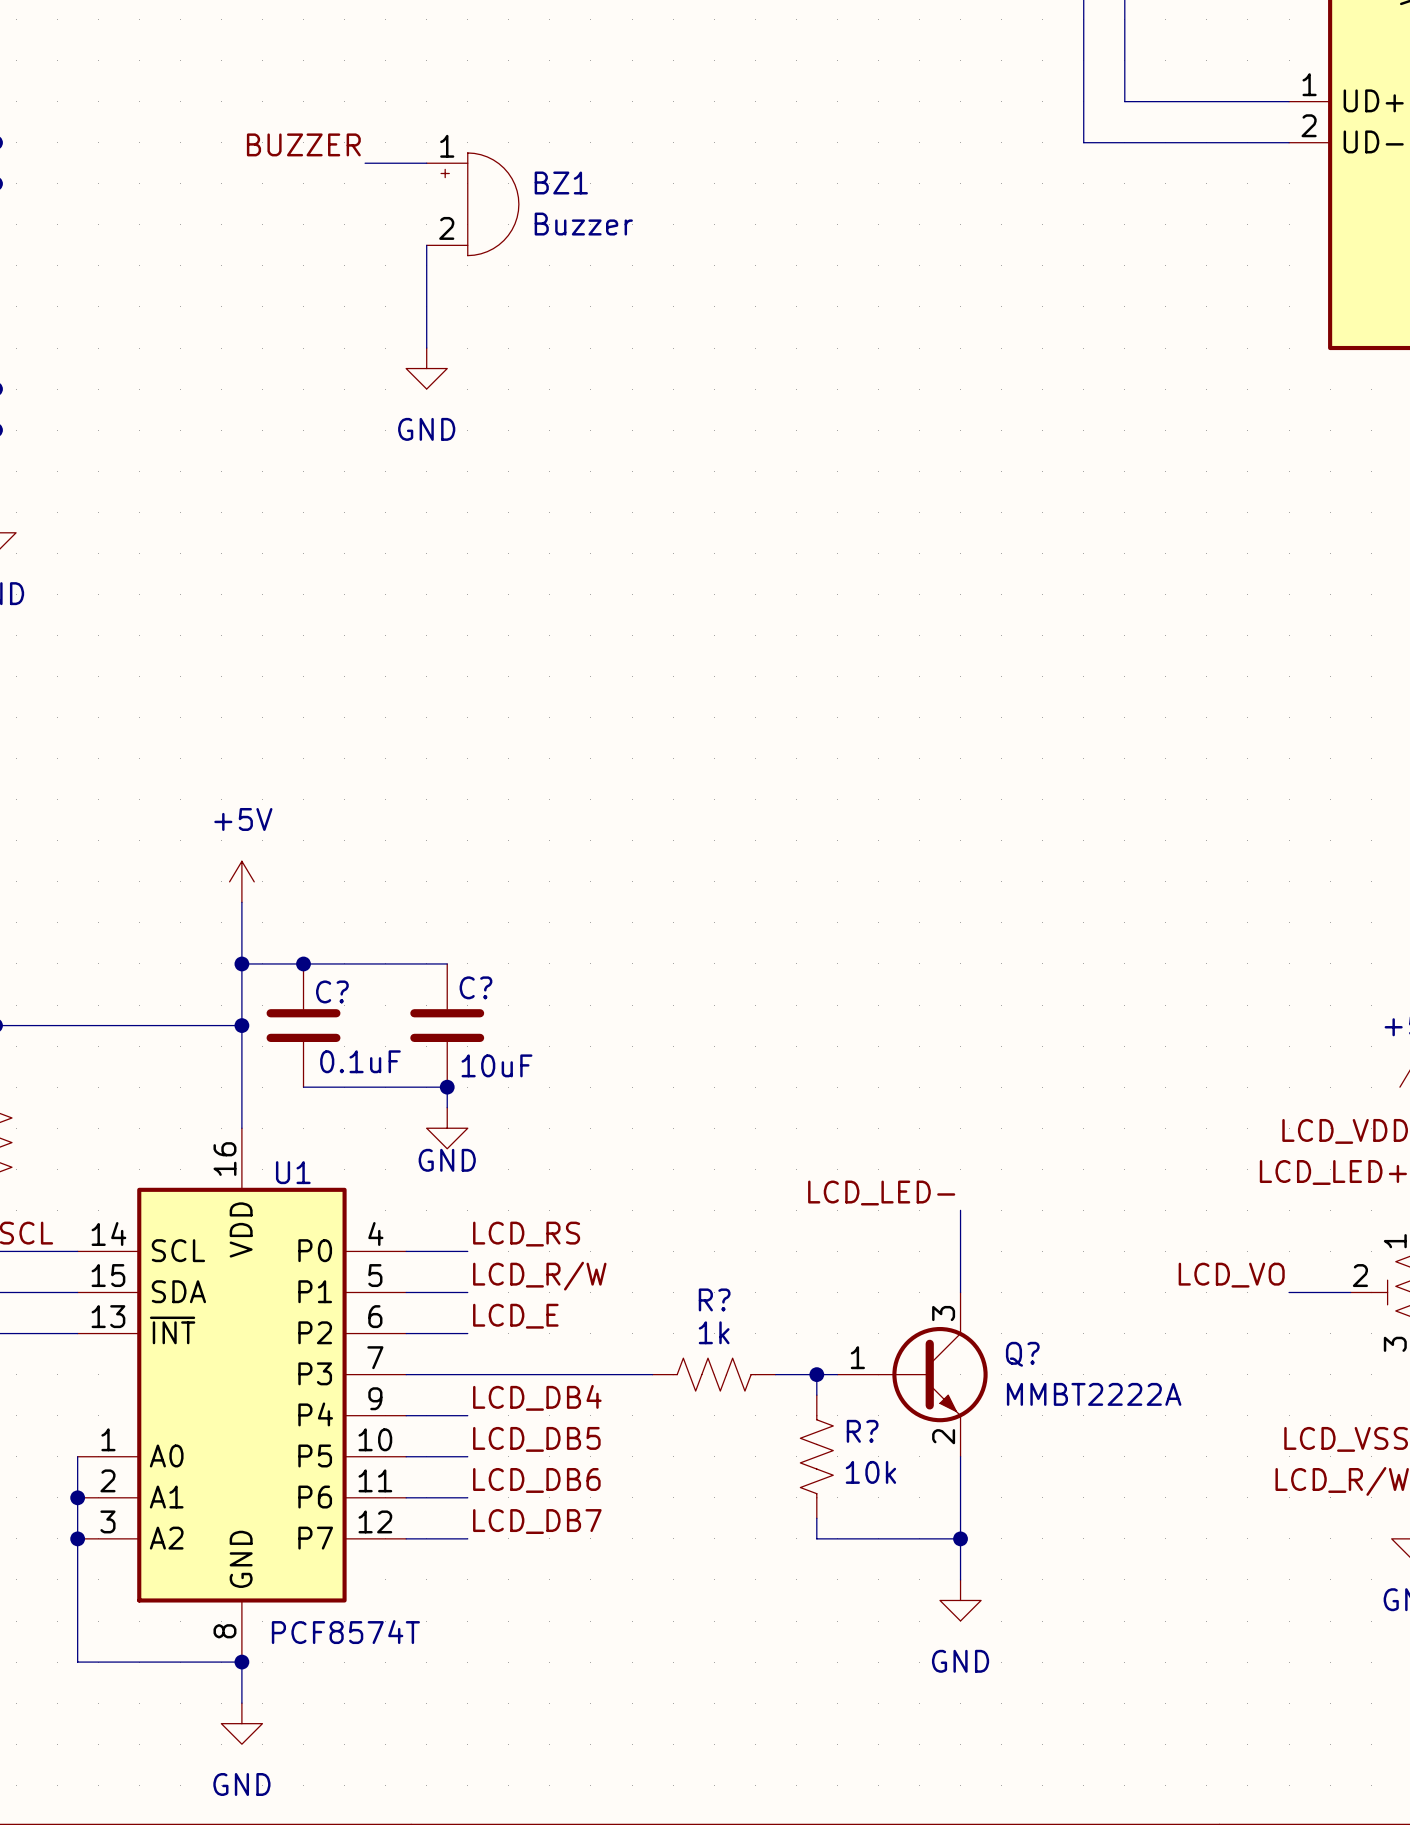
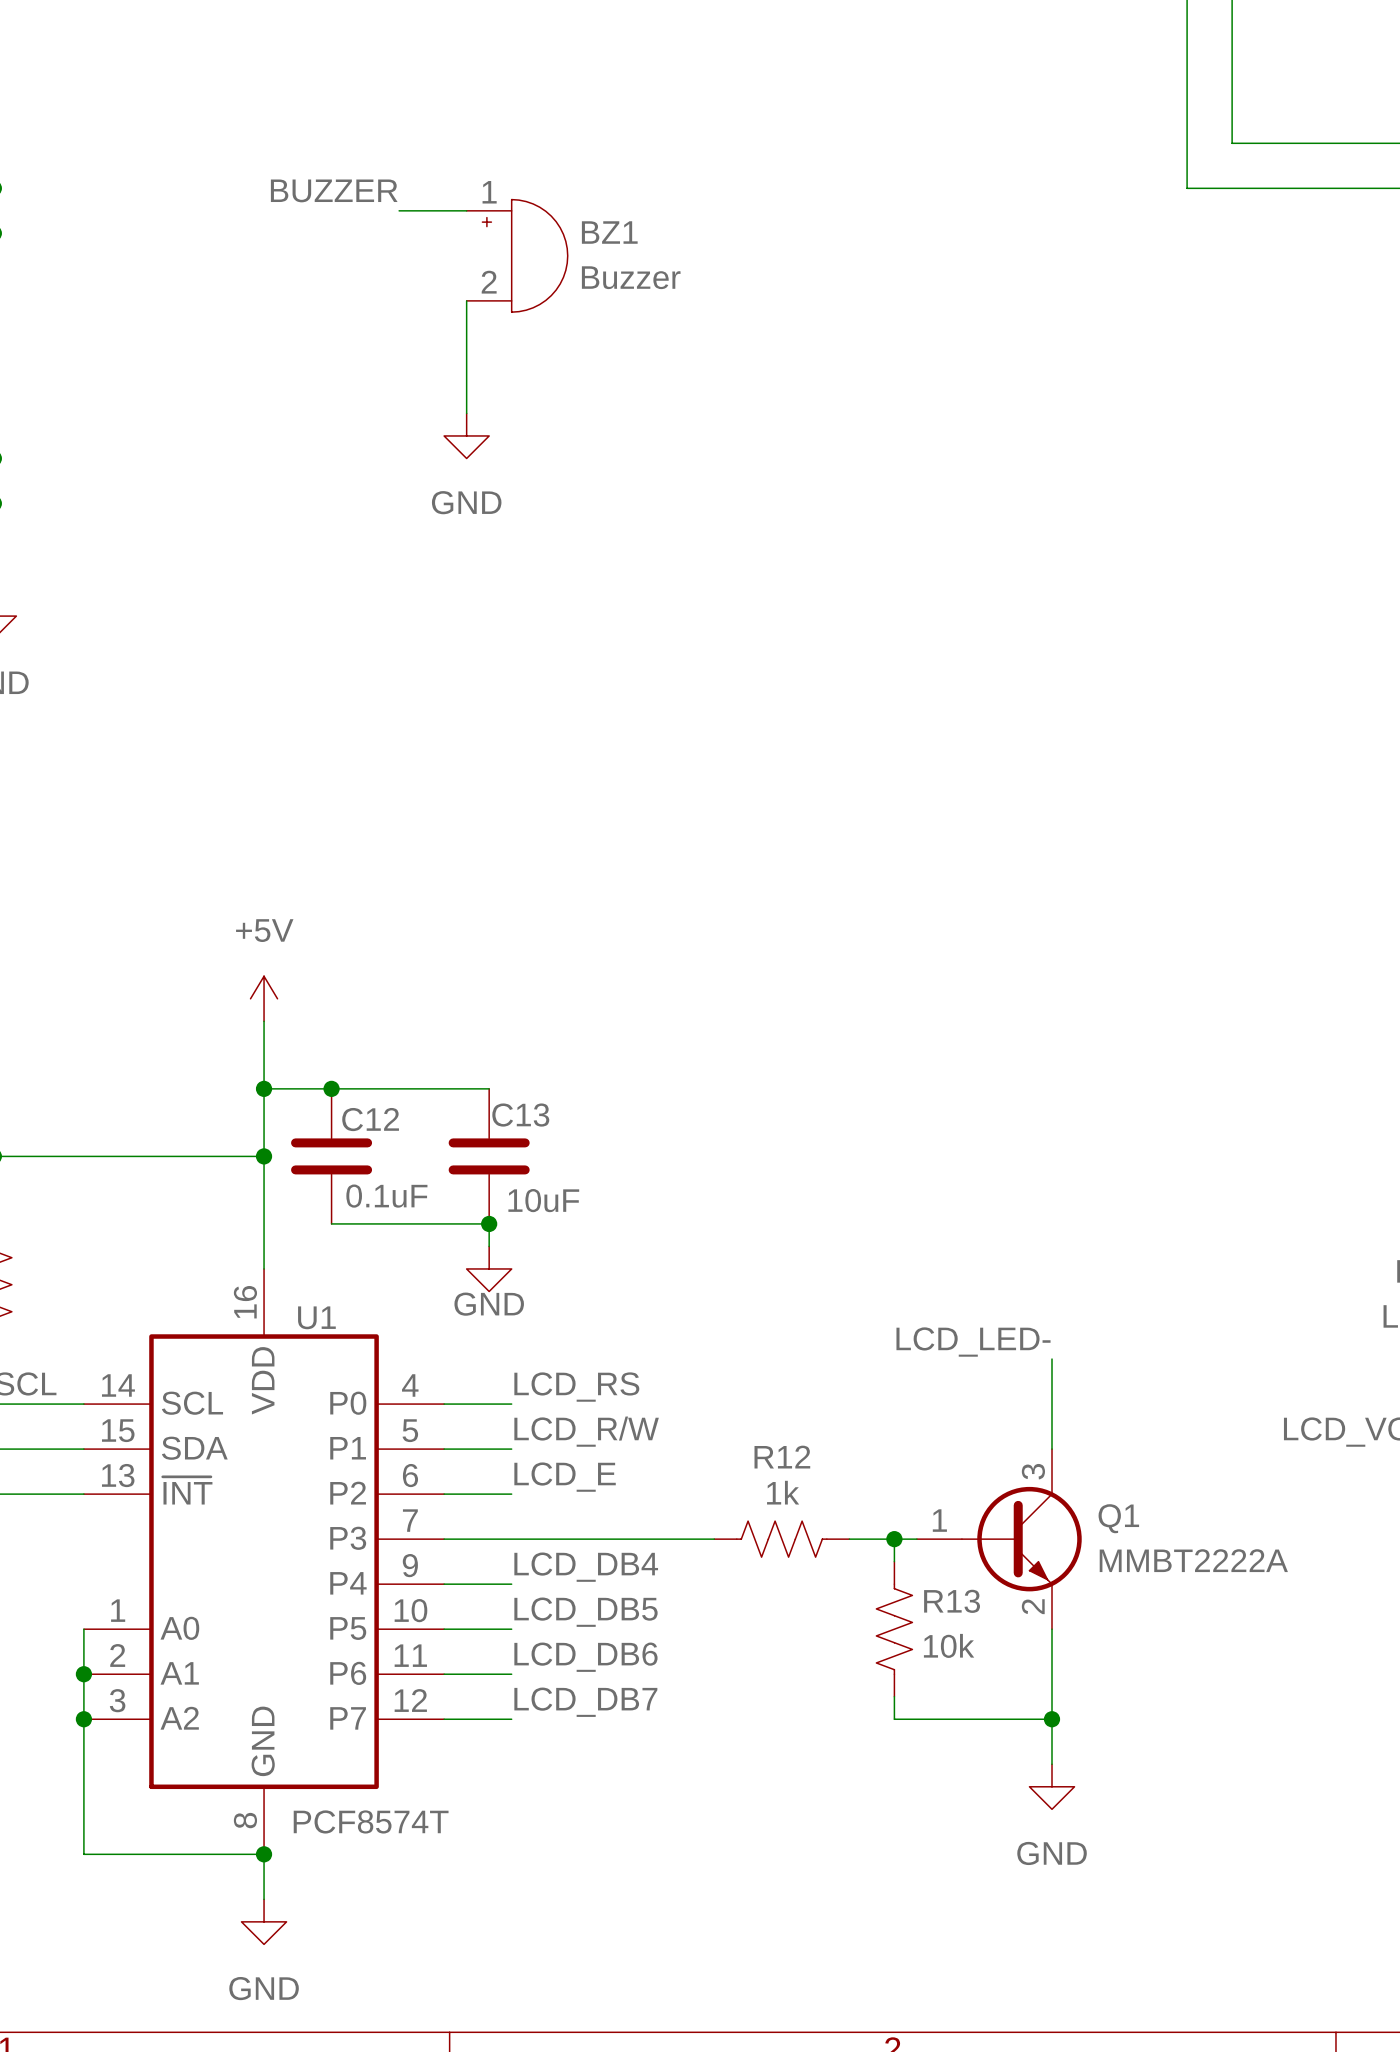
C? name: C? (475, 987) -> C13 (520, 1115)
C? name: C? (332, 991) -> C12 (370, 1119)
R? name: R? (714, 1299) -> R12 (782, 1457)
Q? name: Q? (1022, 1354) -> Q1 (1118, 1518)
R? name: R? (862, 1431) -> R13 (952, 1601)

